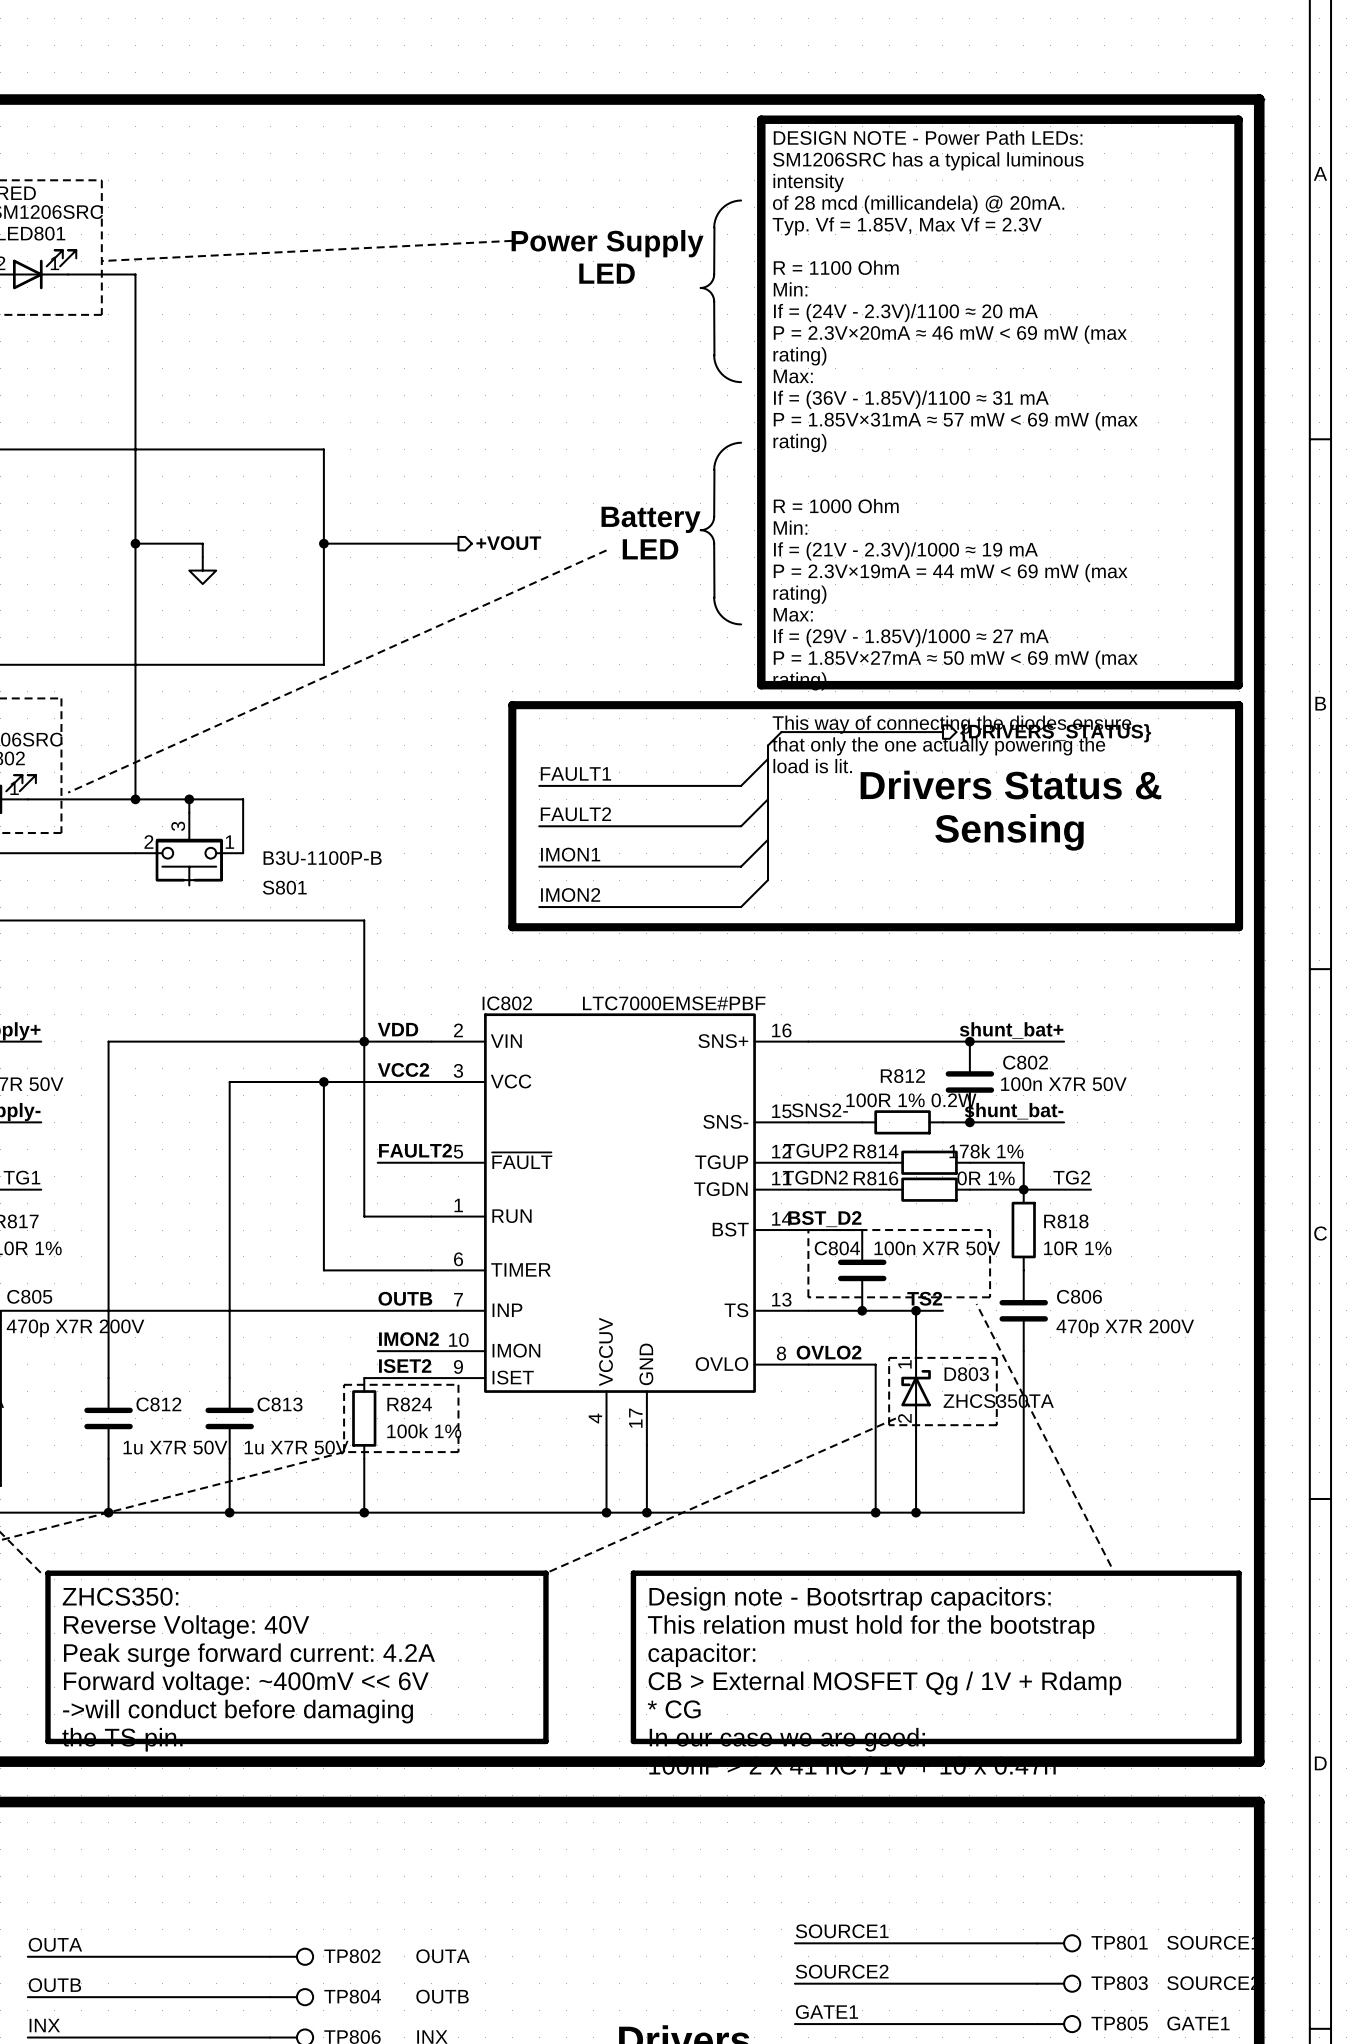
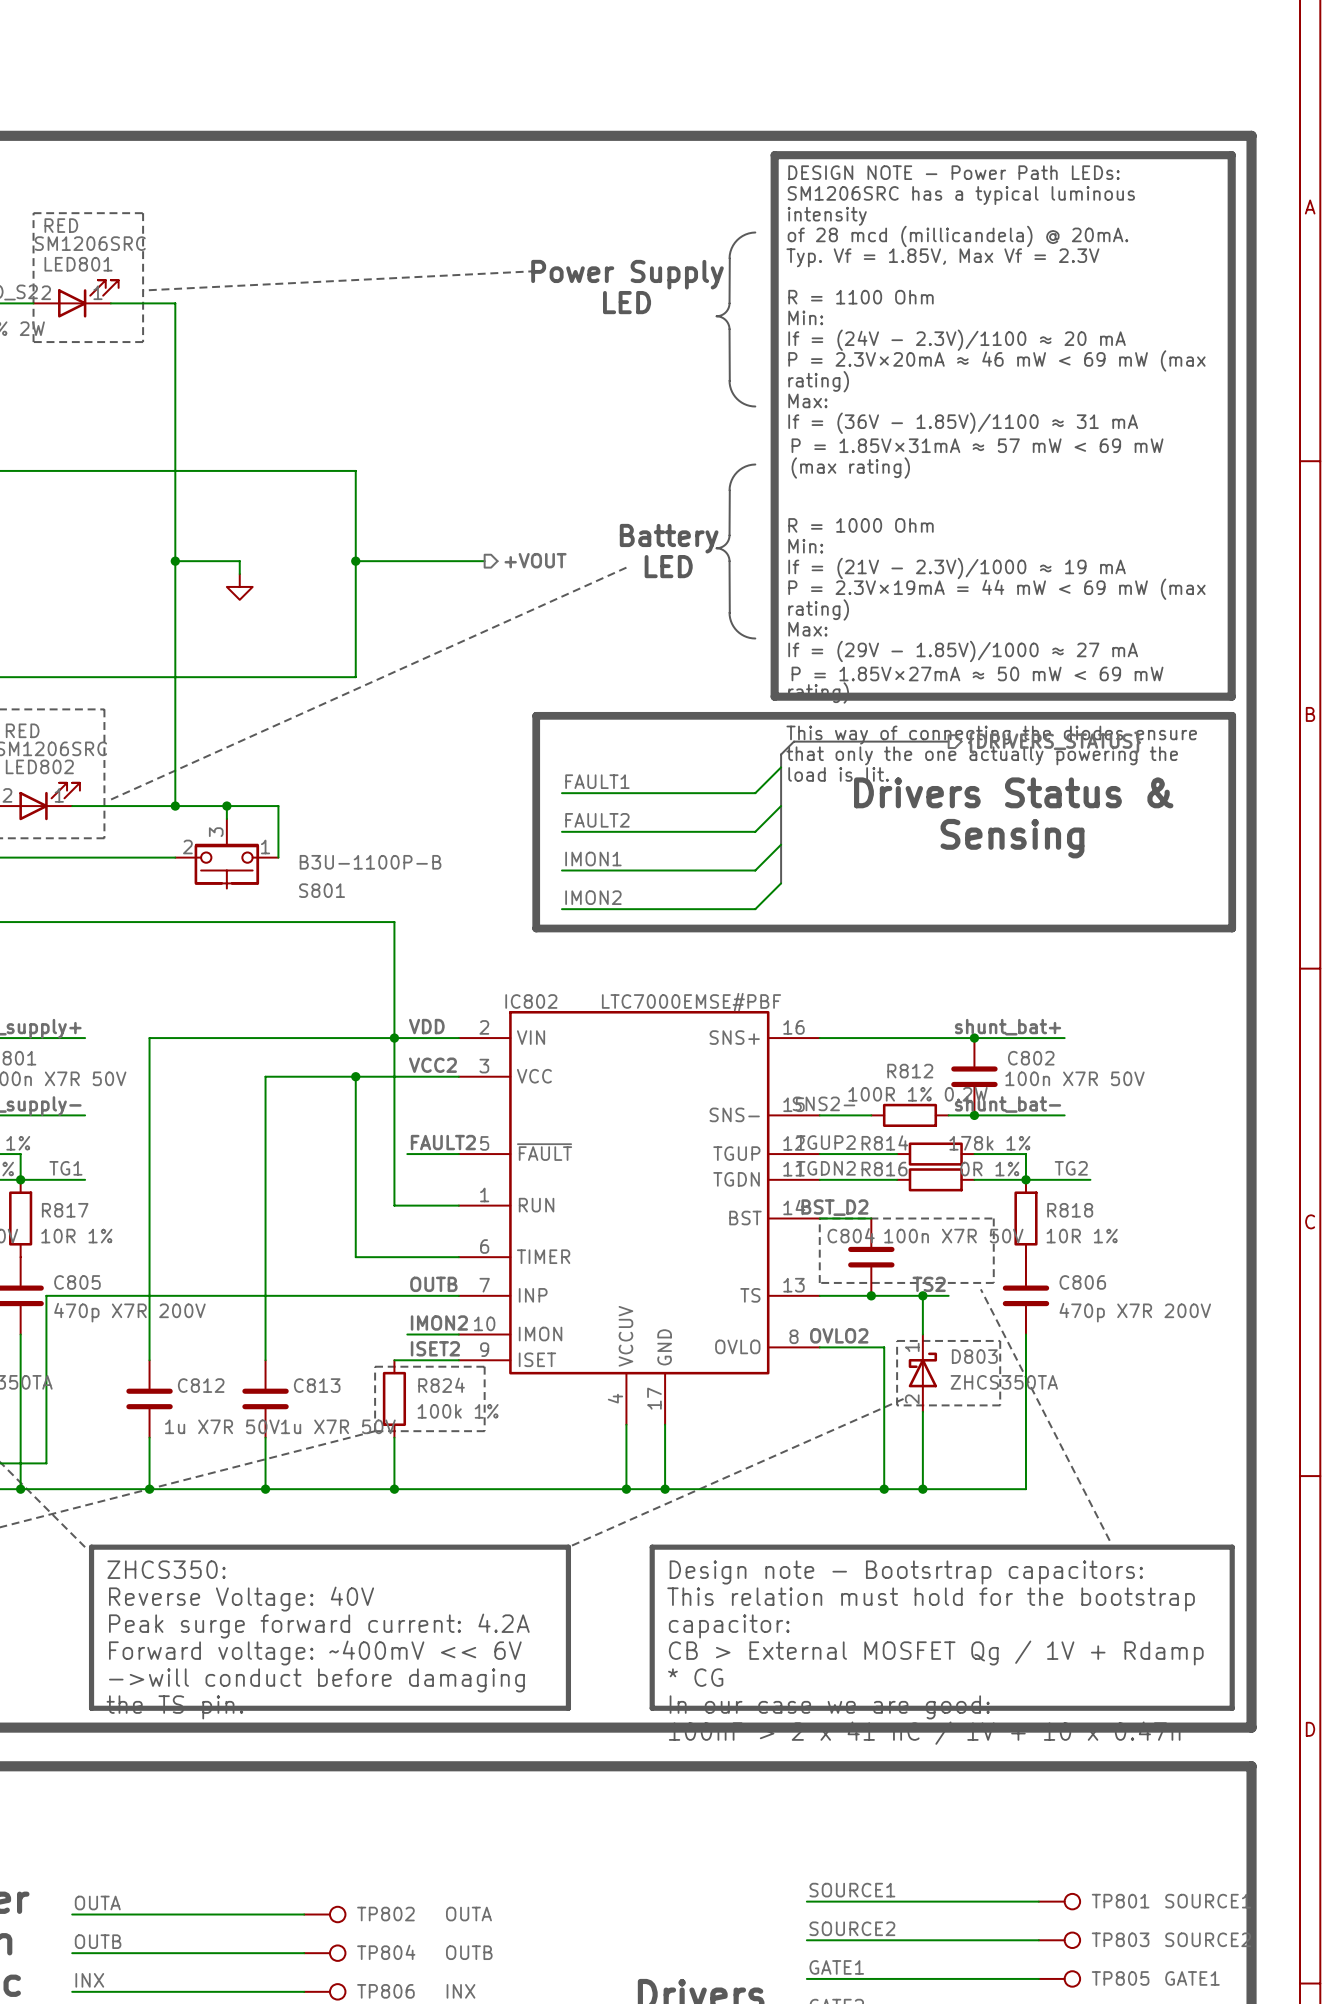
text: P = 1.85V×31mA ≈ 57 mW < 69 mW (max (955, 421) -> P = 1.85V×31mA ≈ 57 mW < 69 mW (977, 445)
text: rating) (799, 443) -> (max rating) (850, 468)
text: P = 1.85V×27mA ≈ 50 mW < 69 mW (max (955, 659) -> P = 1.85V×27mA ≈ 50 mW < 69 mW (977, 673)

